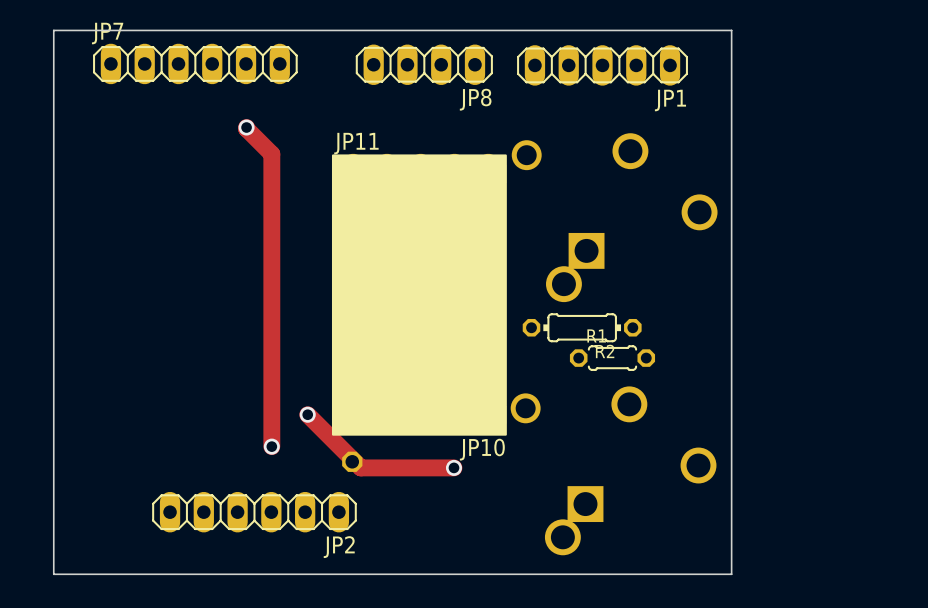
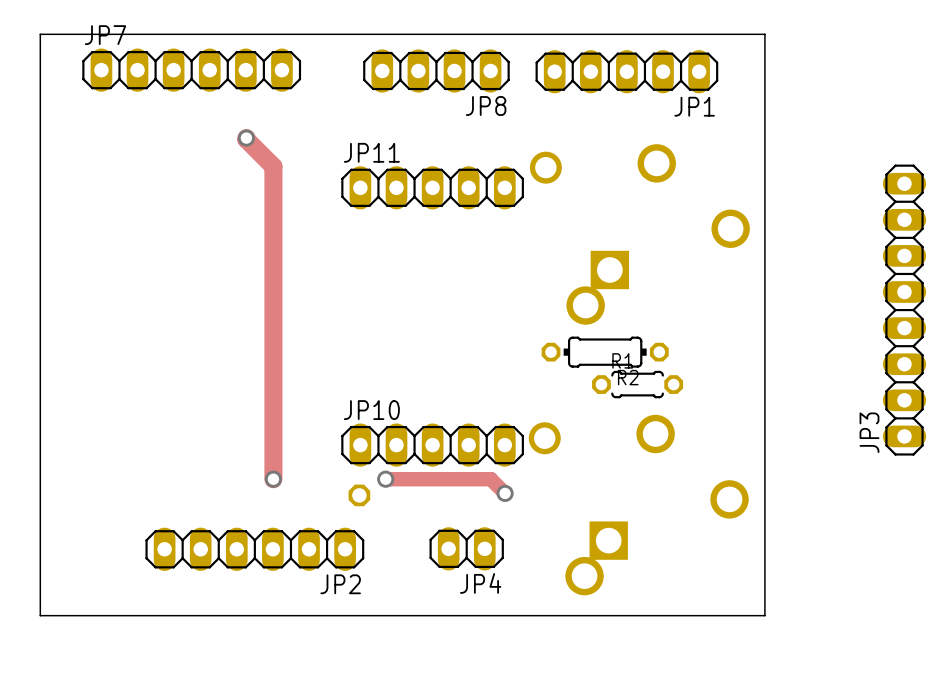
drawing: [331, 154, 507, 436] -> none
JP3: none -> (904, 310)
track: (307, 414) (360, 467) (453, 467) -> none
via: (307, 414) -> none
track: none -> (385, 479) (490, 479) (505, 493)
via: none -> (385, 479)
JP10 name position: JP10 (482, 449) -> JP10 (371, 410)
via position: (453, 467) -> (505, 493)
JP4: none -> (466, 548)

